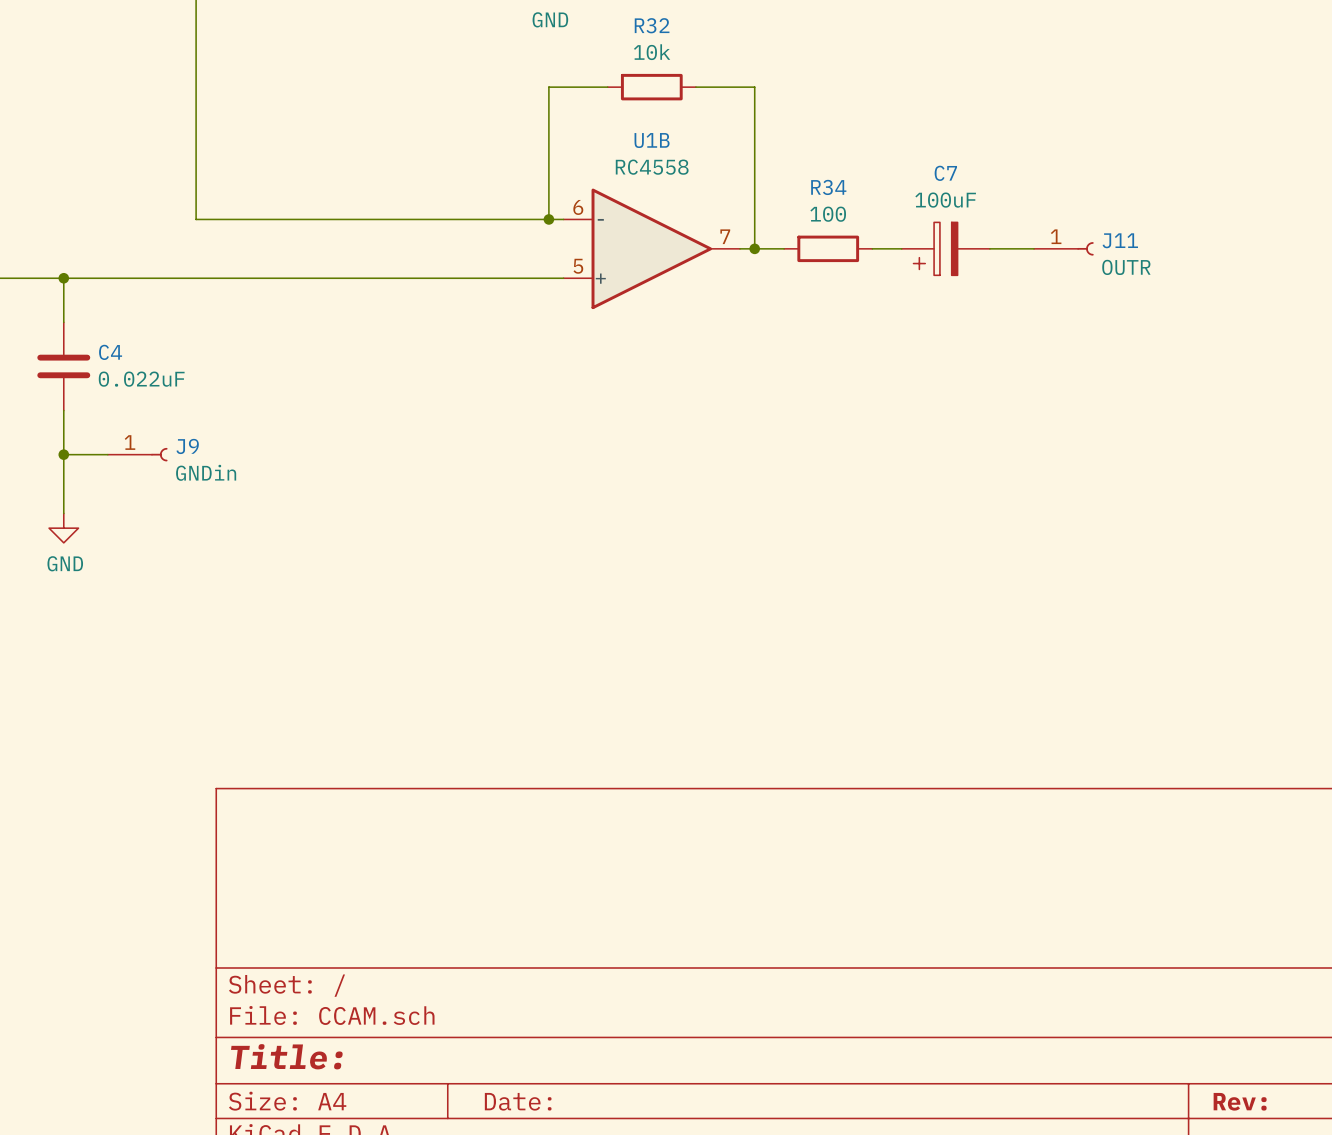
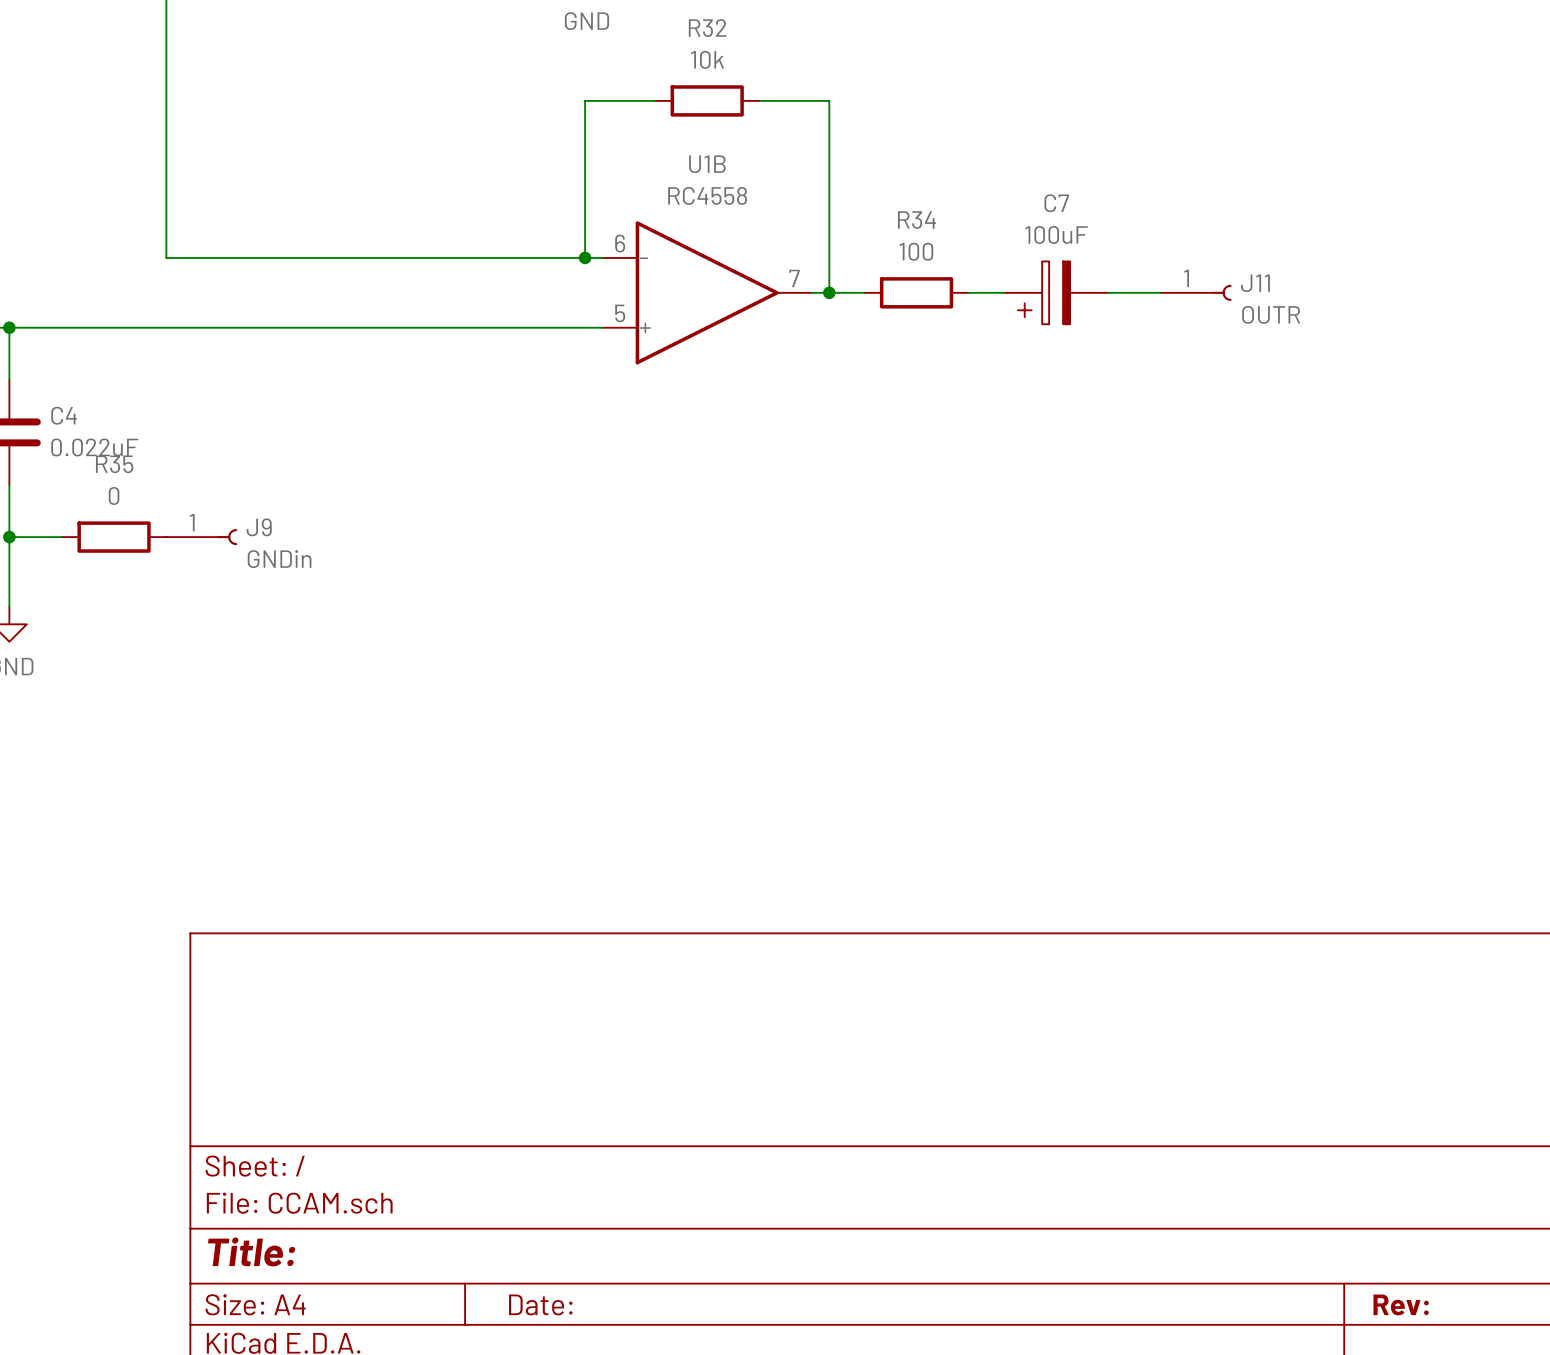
J9 position: (137, 454) -> (201, 537)
R35: none -> 0 (114, 537)

